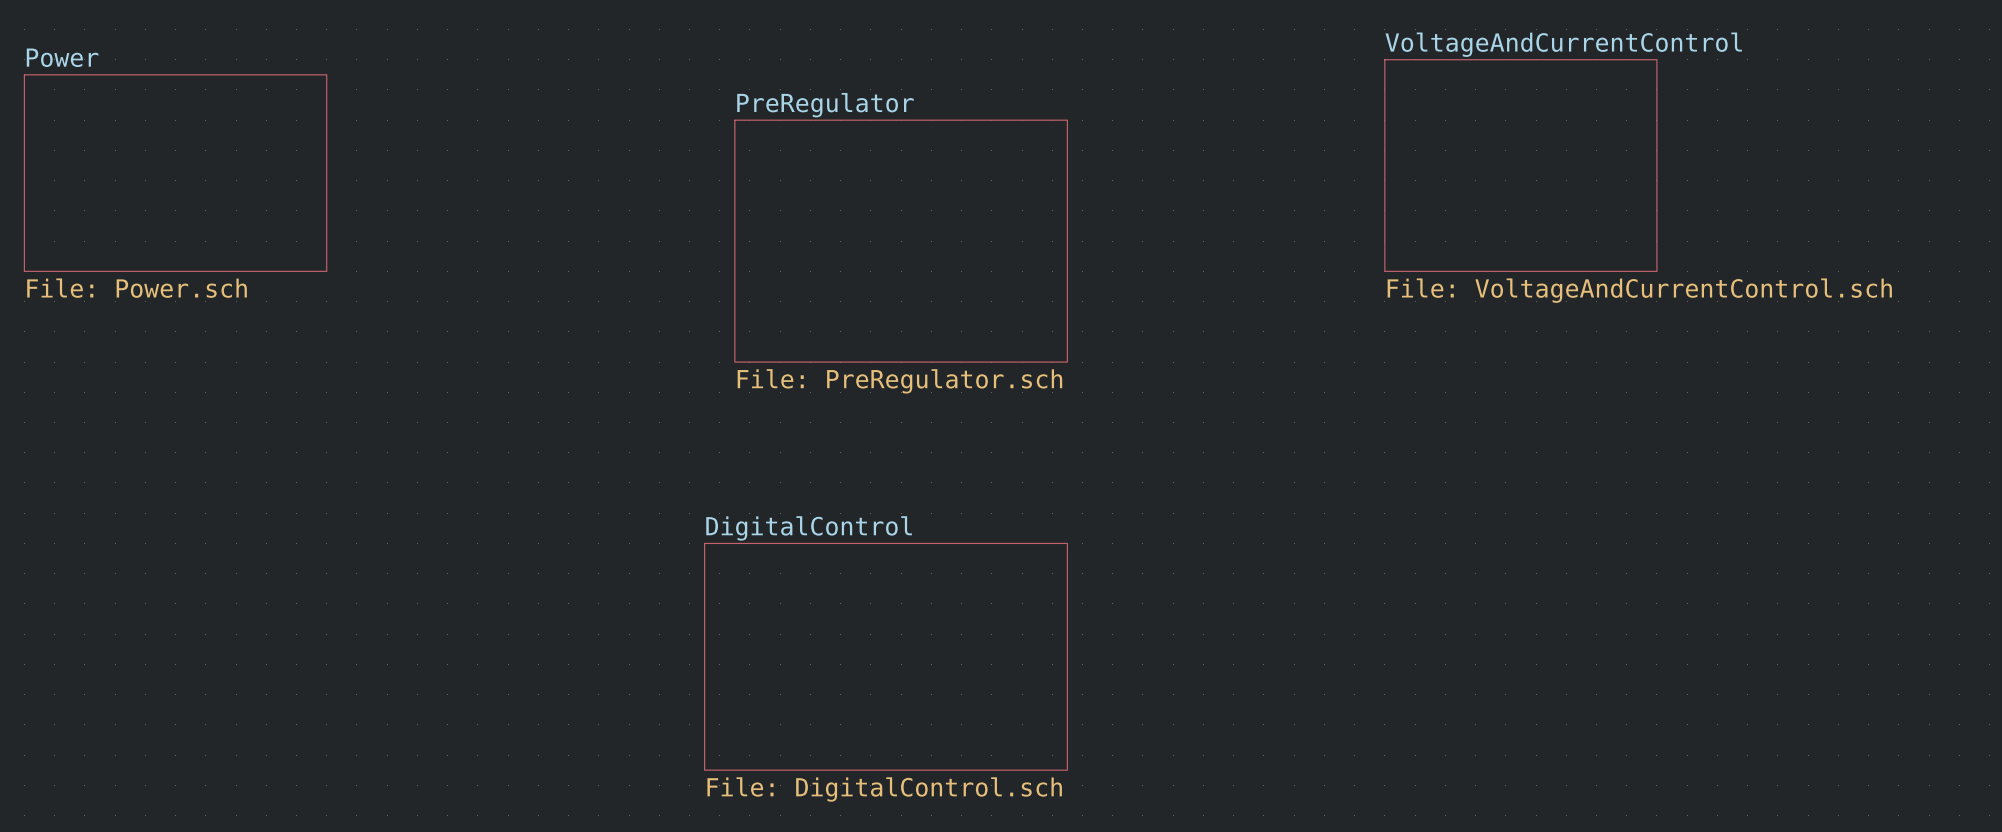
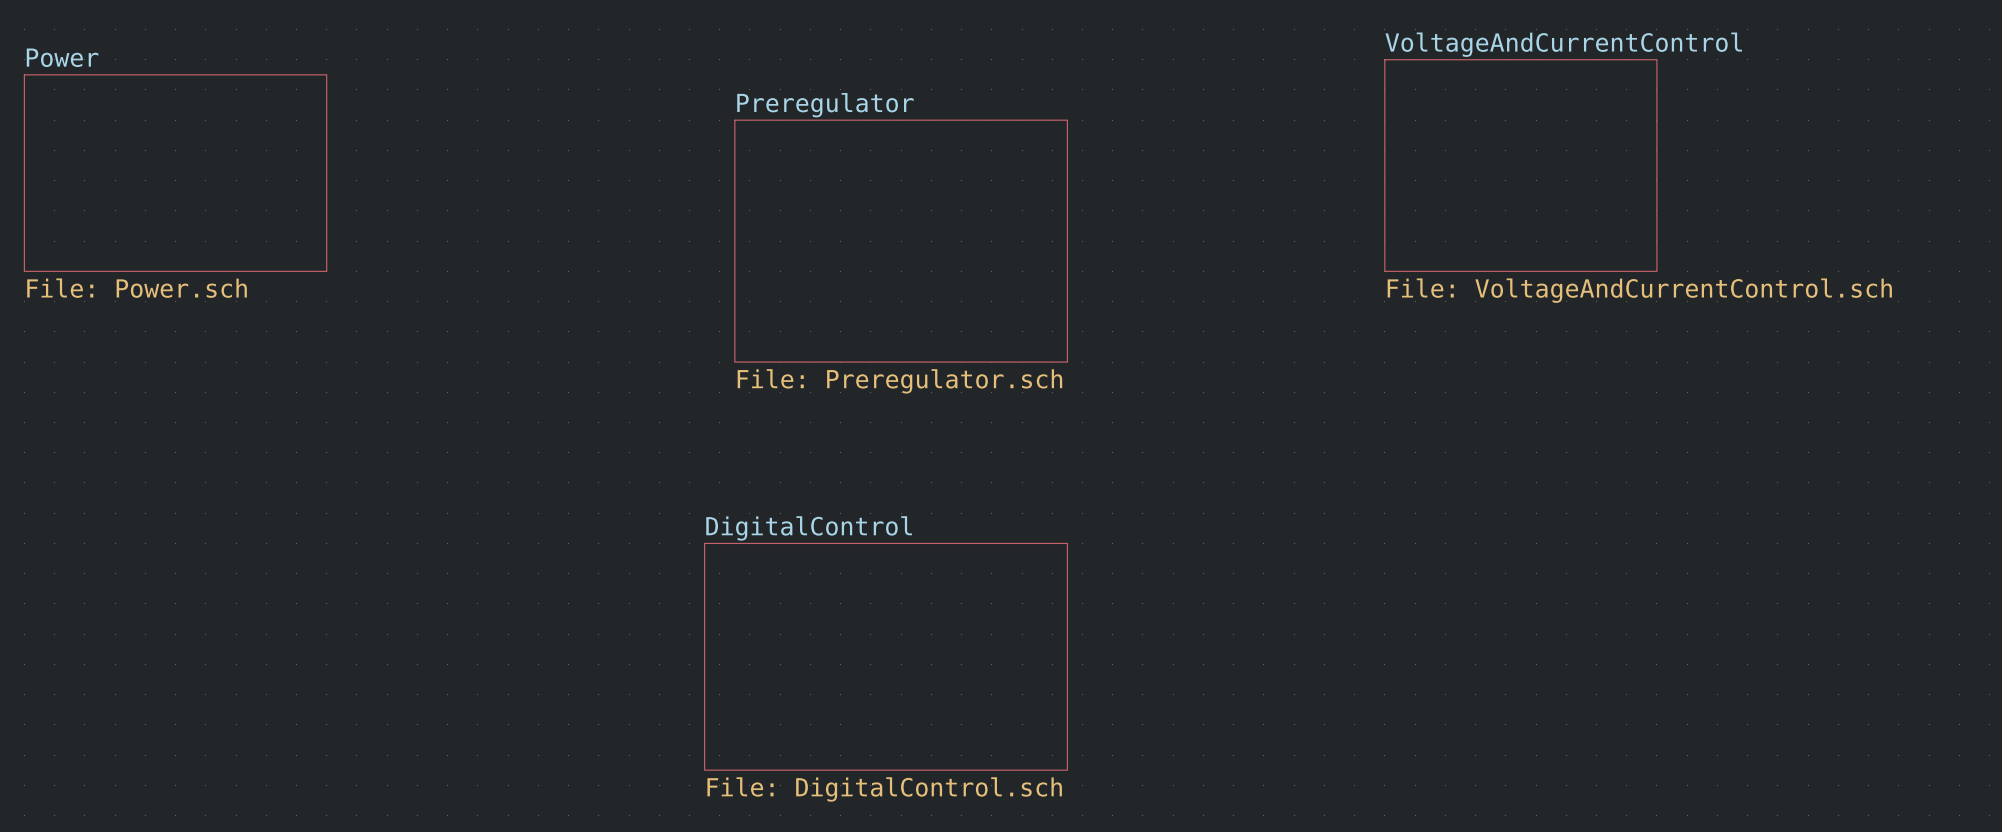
sheet PreRegulator name: PreRegulator (825, 105) -> Preregulator (825, 105)
sheet PreRegulator value: File: PreRegulator.sch (899, 381) -> File: Preregulator.sch (899, 381)

